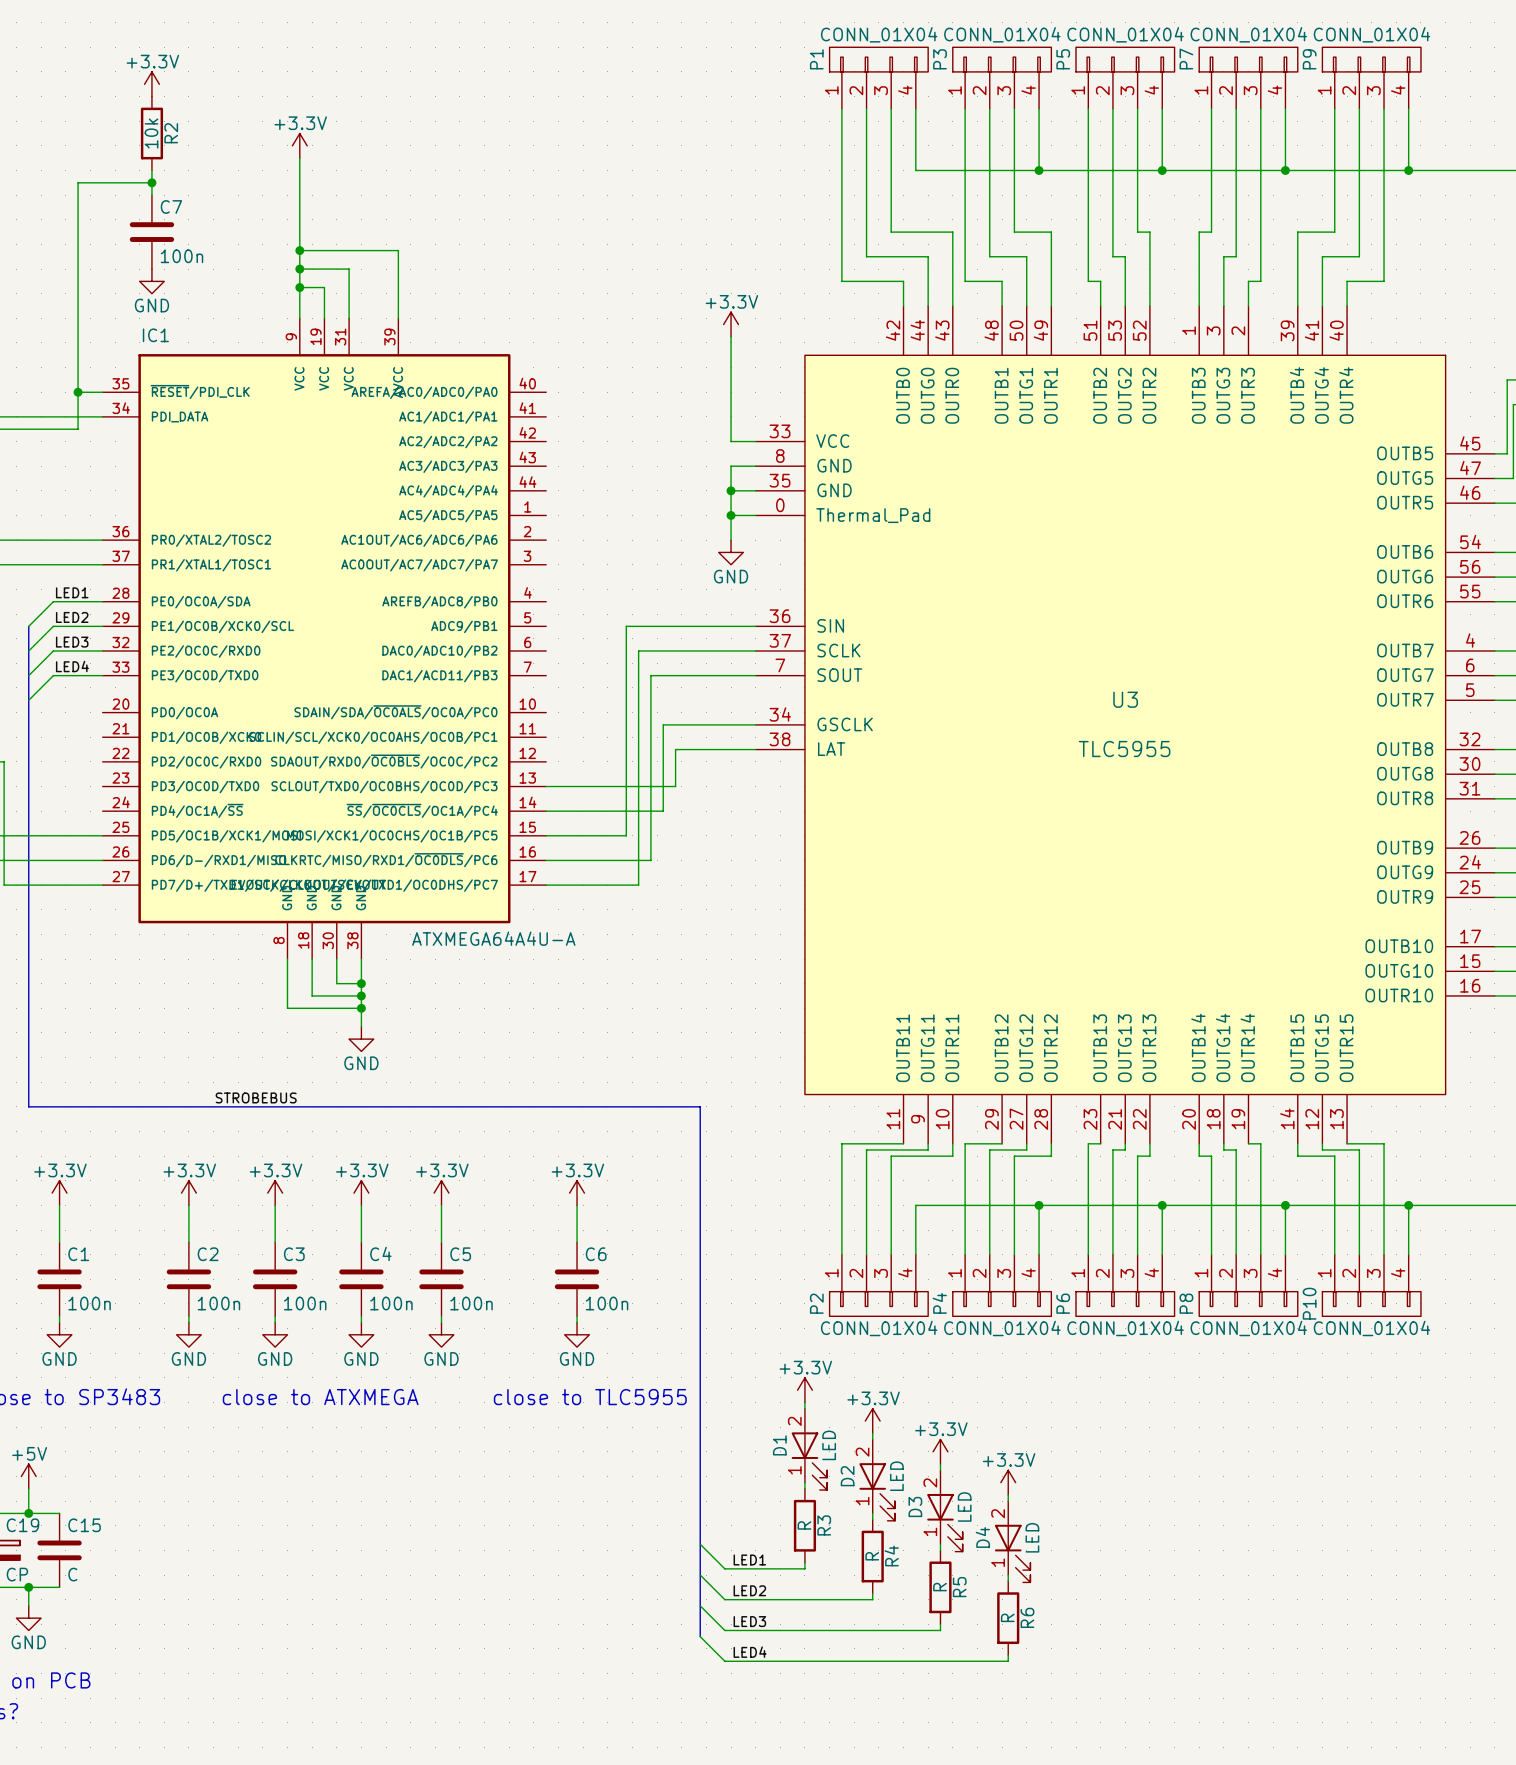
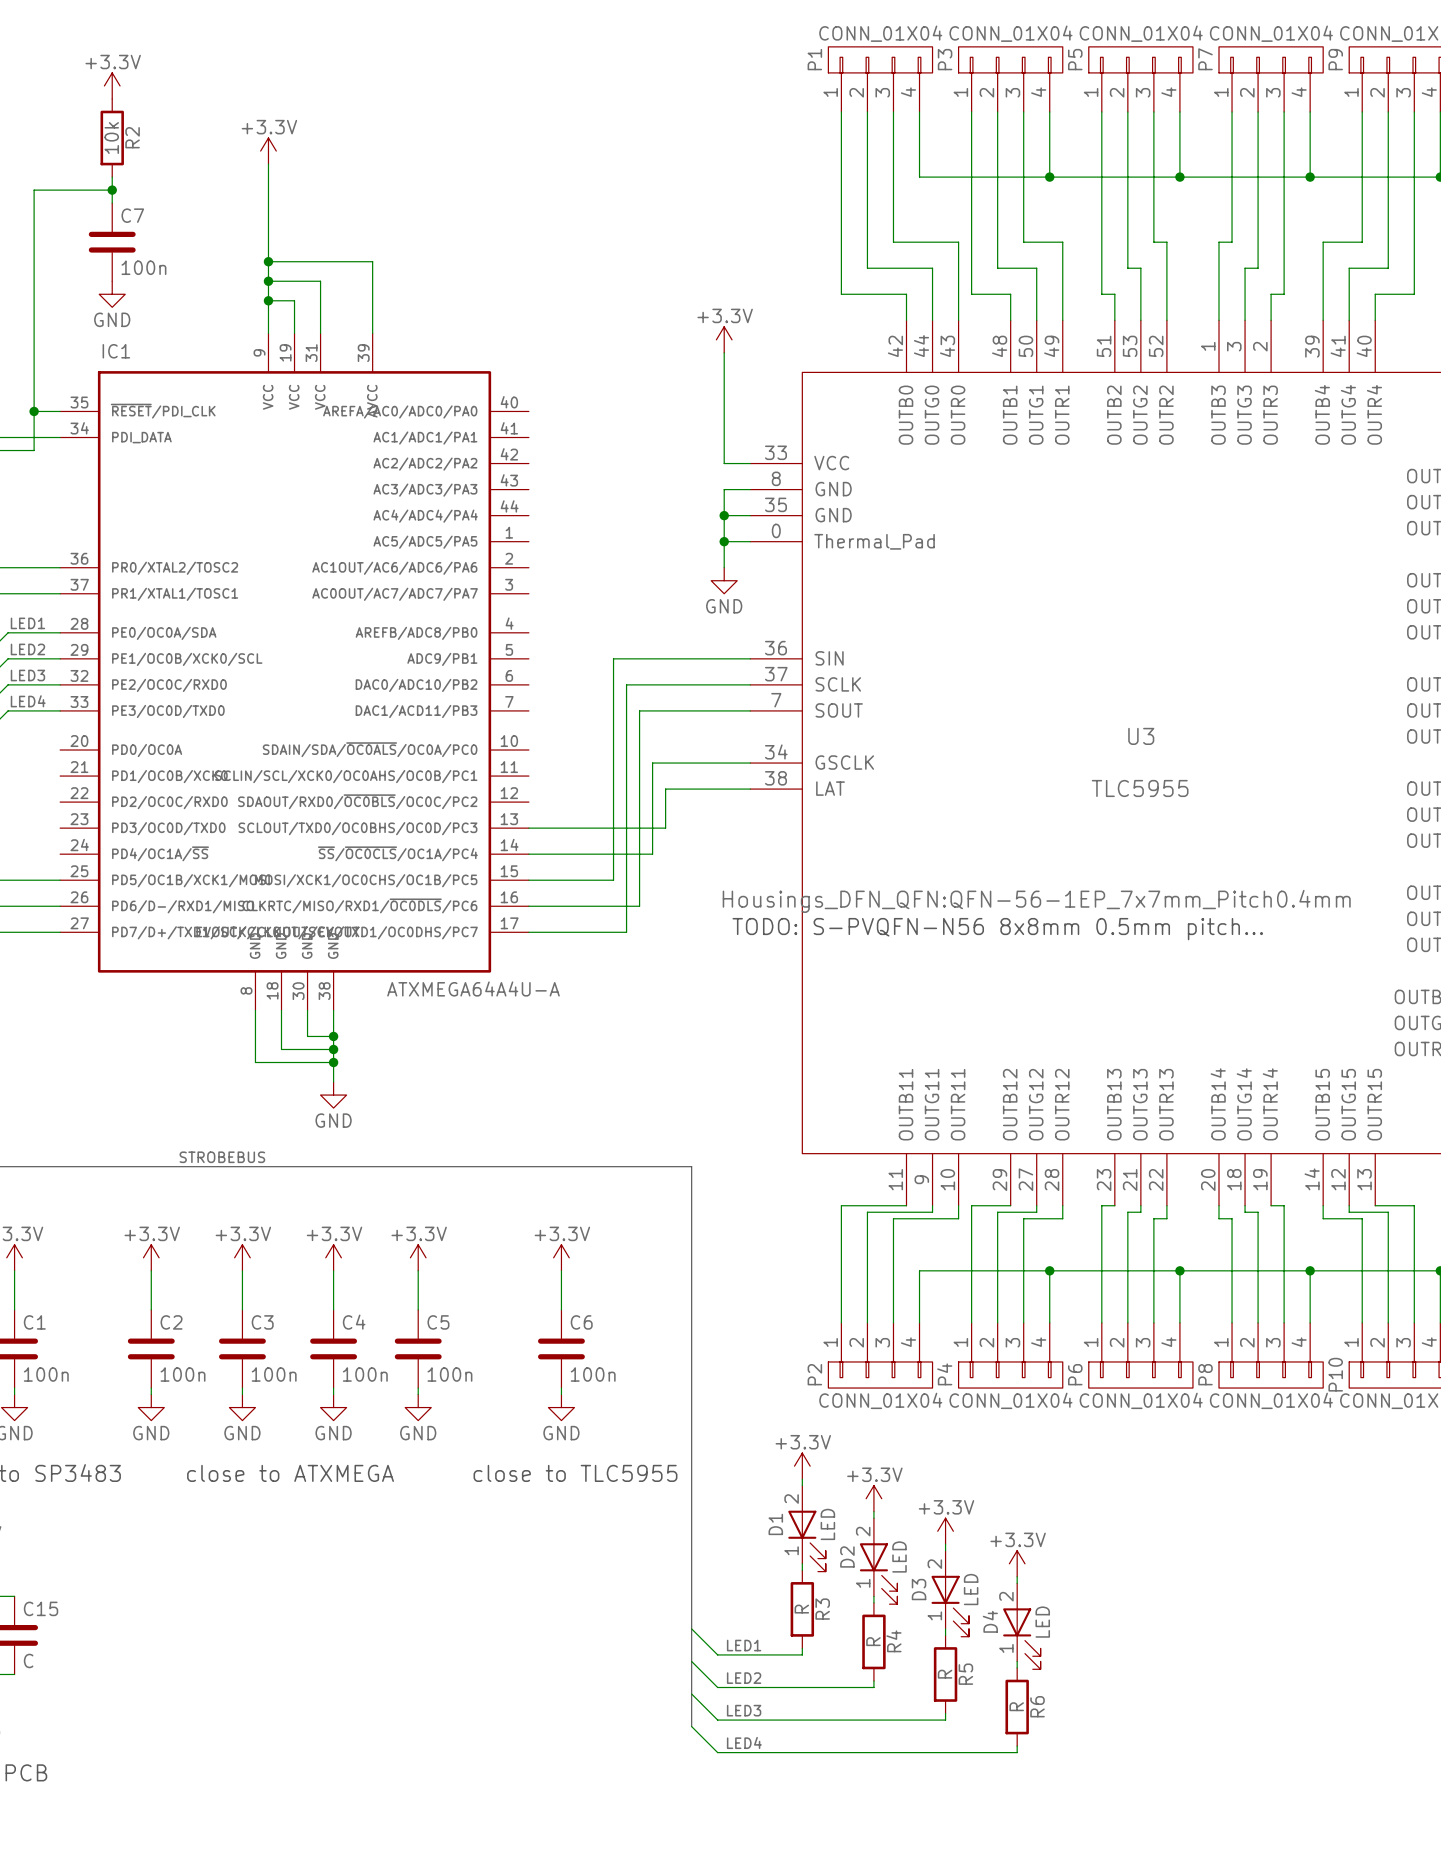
U3 text: none -> Housings_DFN_QFN:QFN-56-1EP_7x7mm_Pitch0.4mm (1036, 901)
text: none -> TODO: S-PVQFN-N56 8x8mm 0.5mm pitch... (997, 929)

